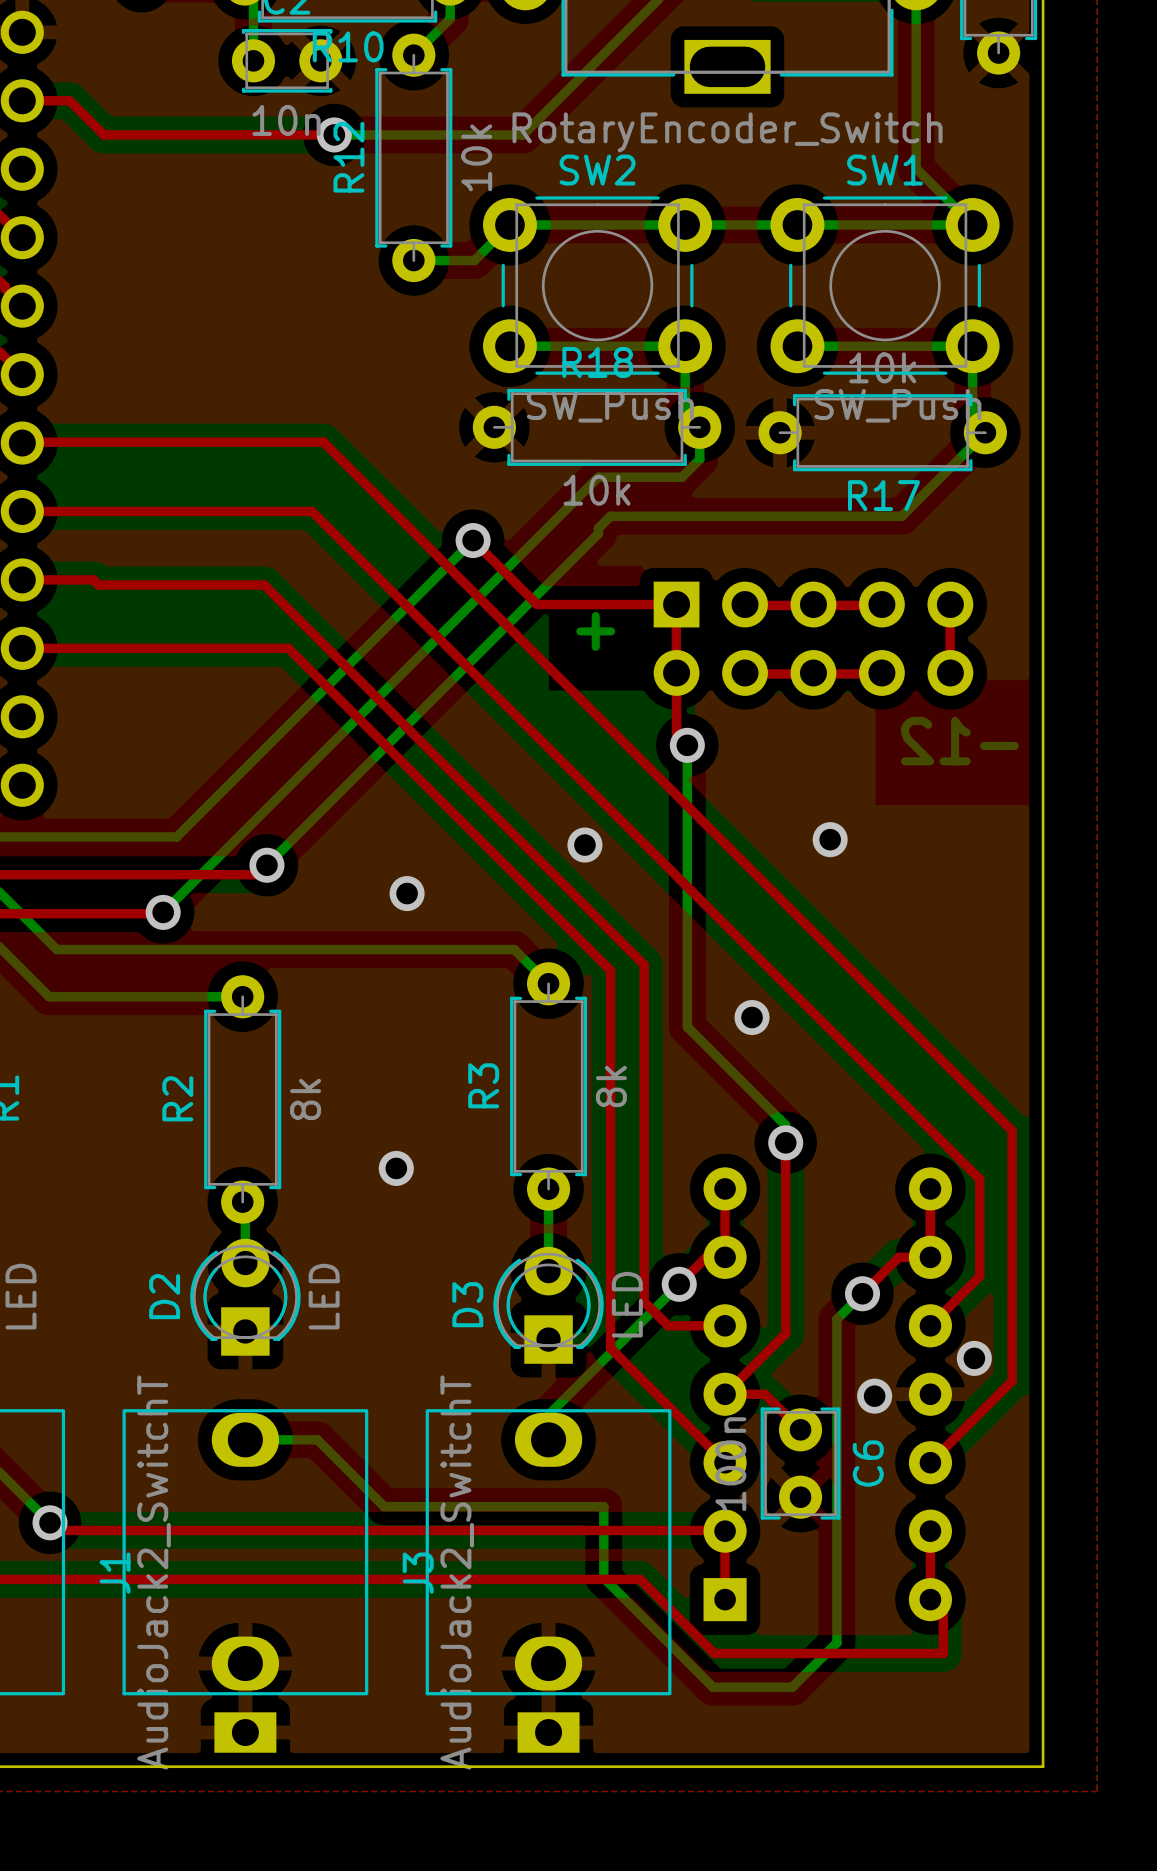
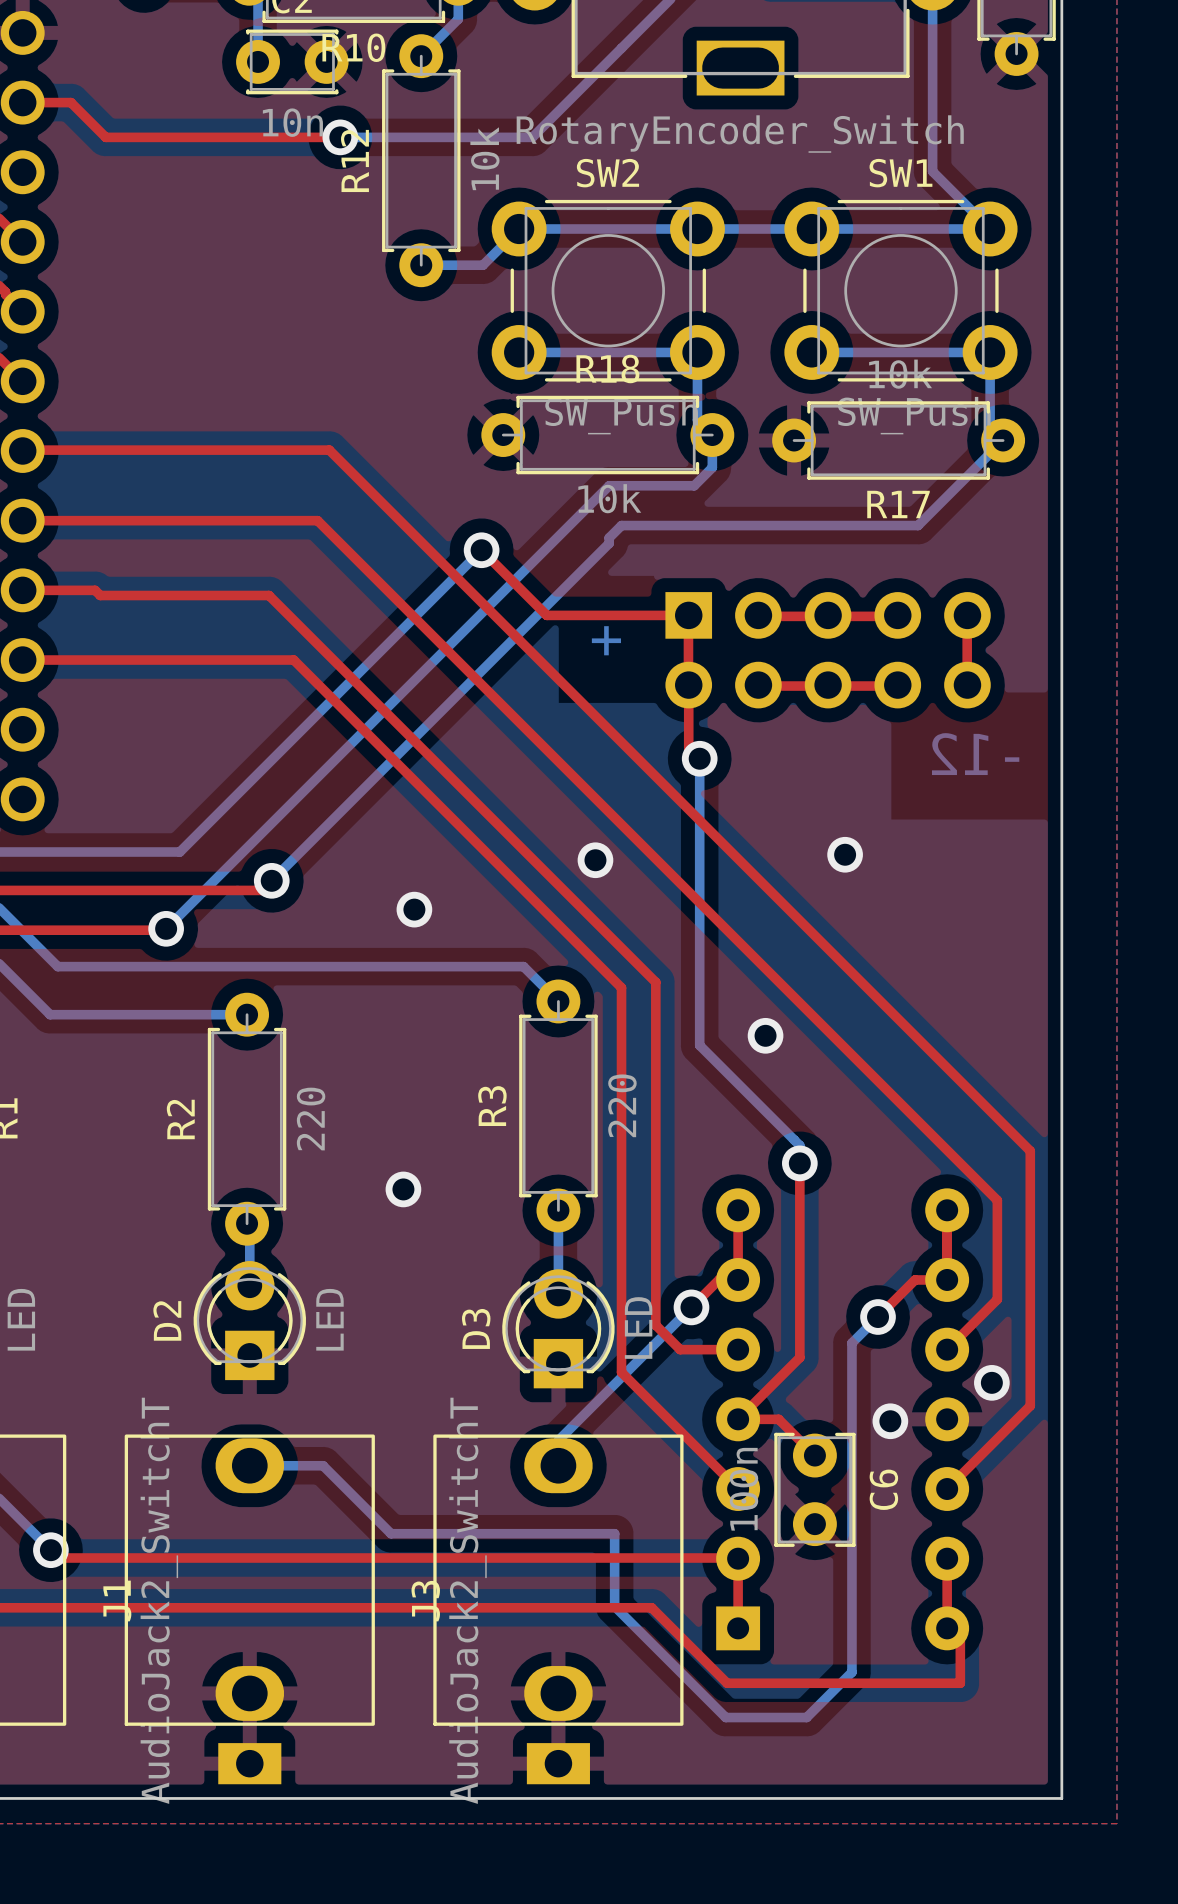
R3 value: 8k (611, 1086) -> 220 (622, 1105)
R2 value: 8k (305, 1099) -> 220 (311, 1119)

